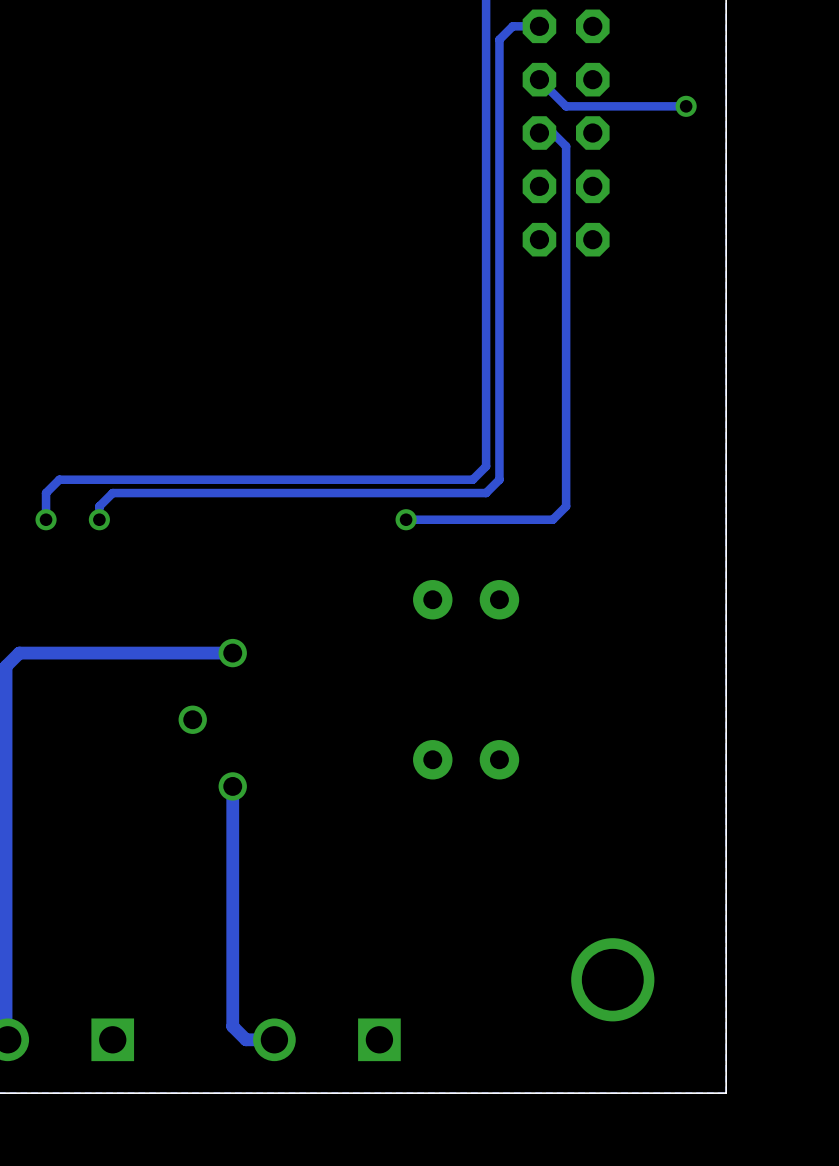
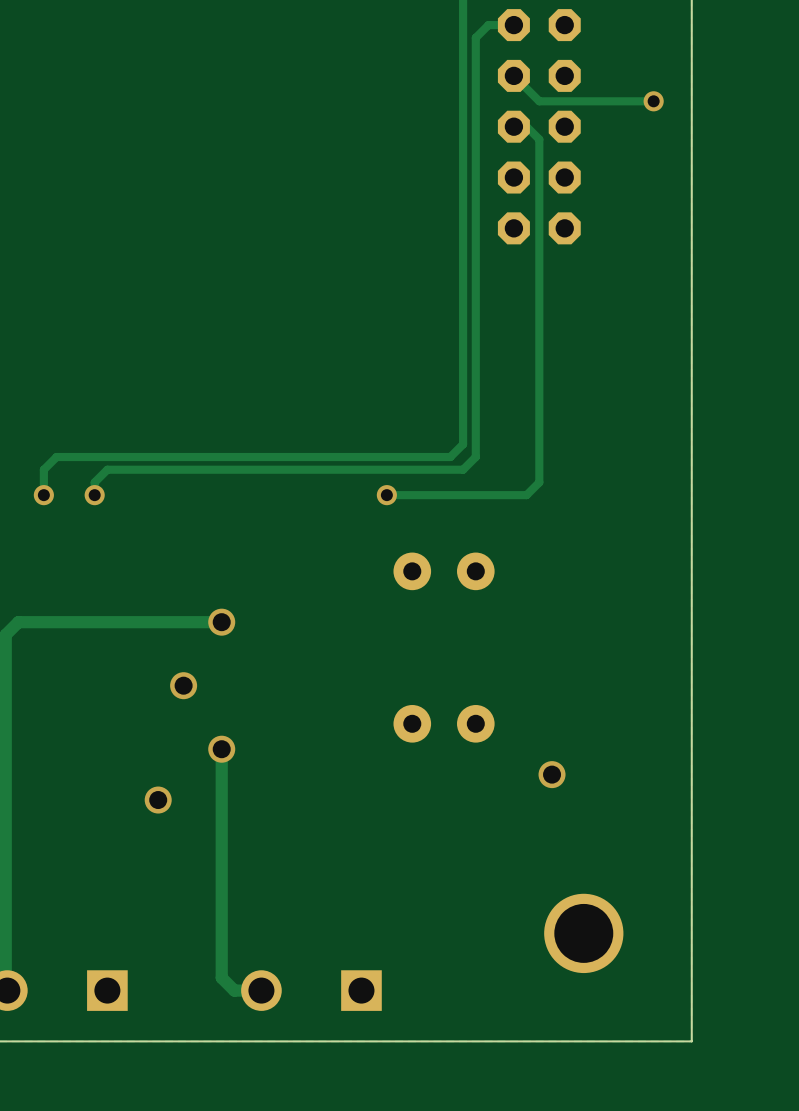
via: none -> (552, 774)
via: none -> (158, 800)

